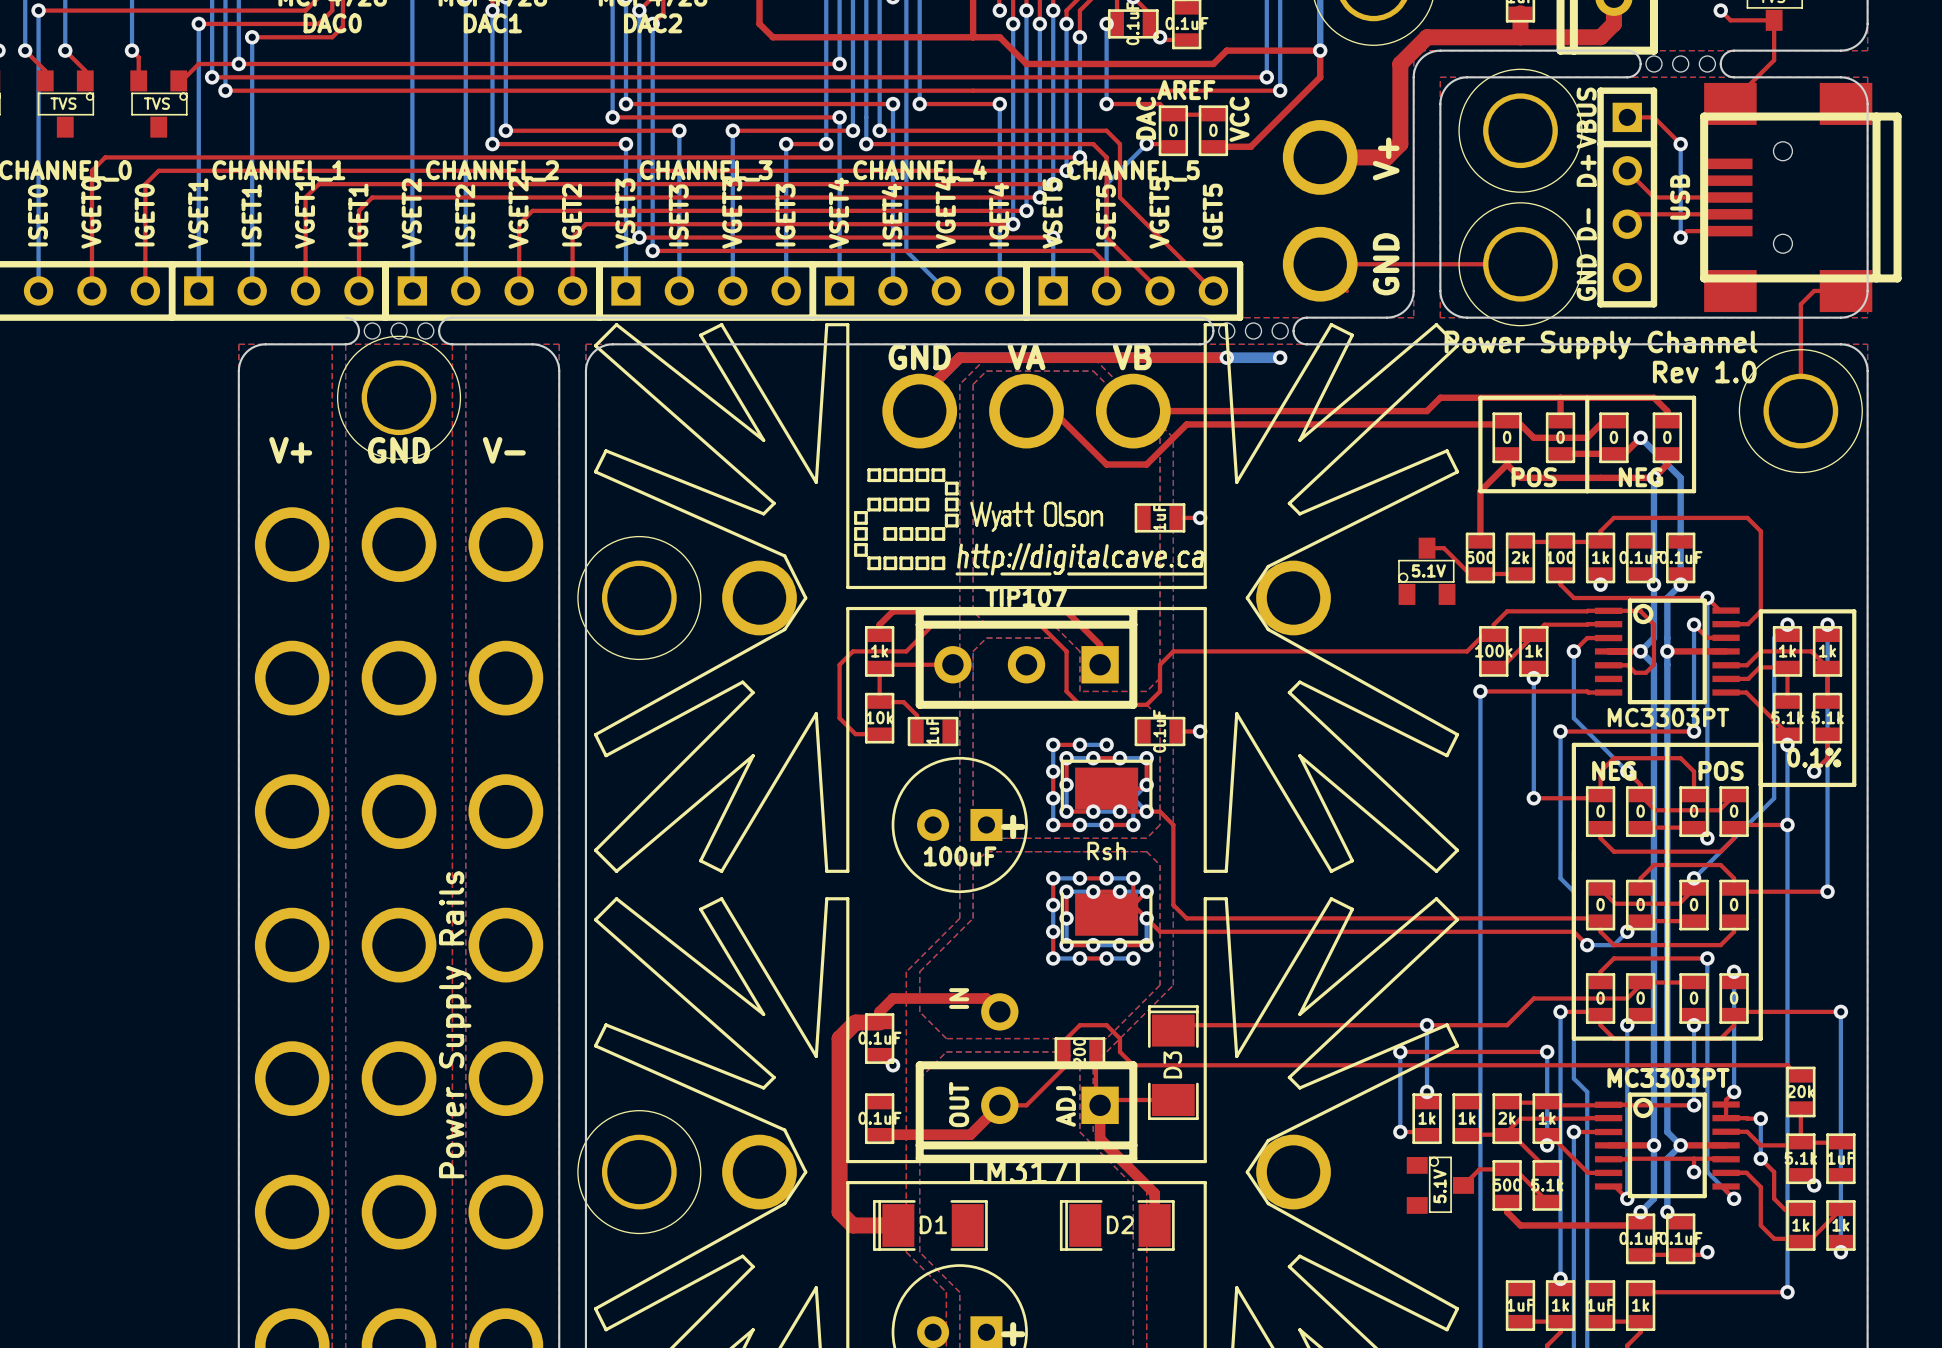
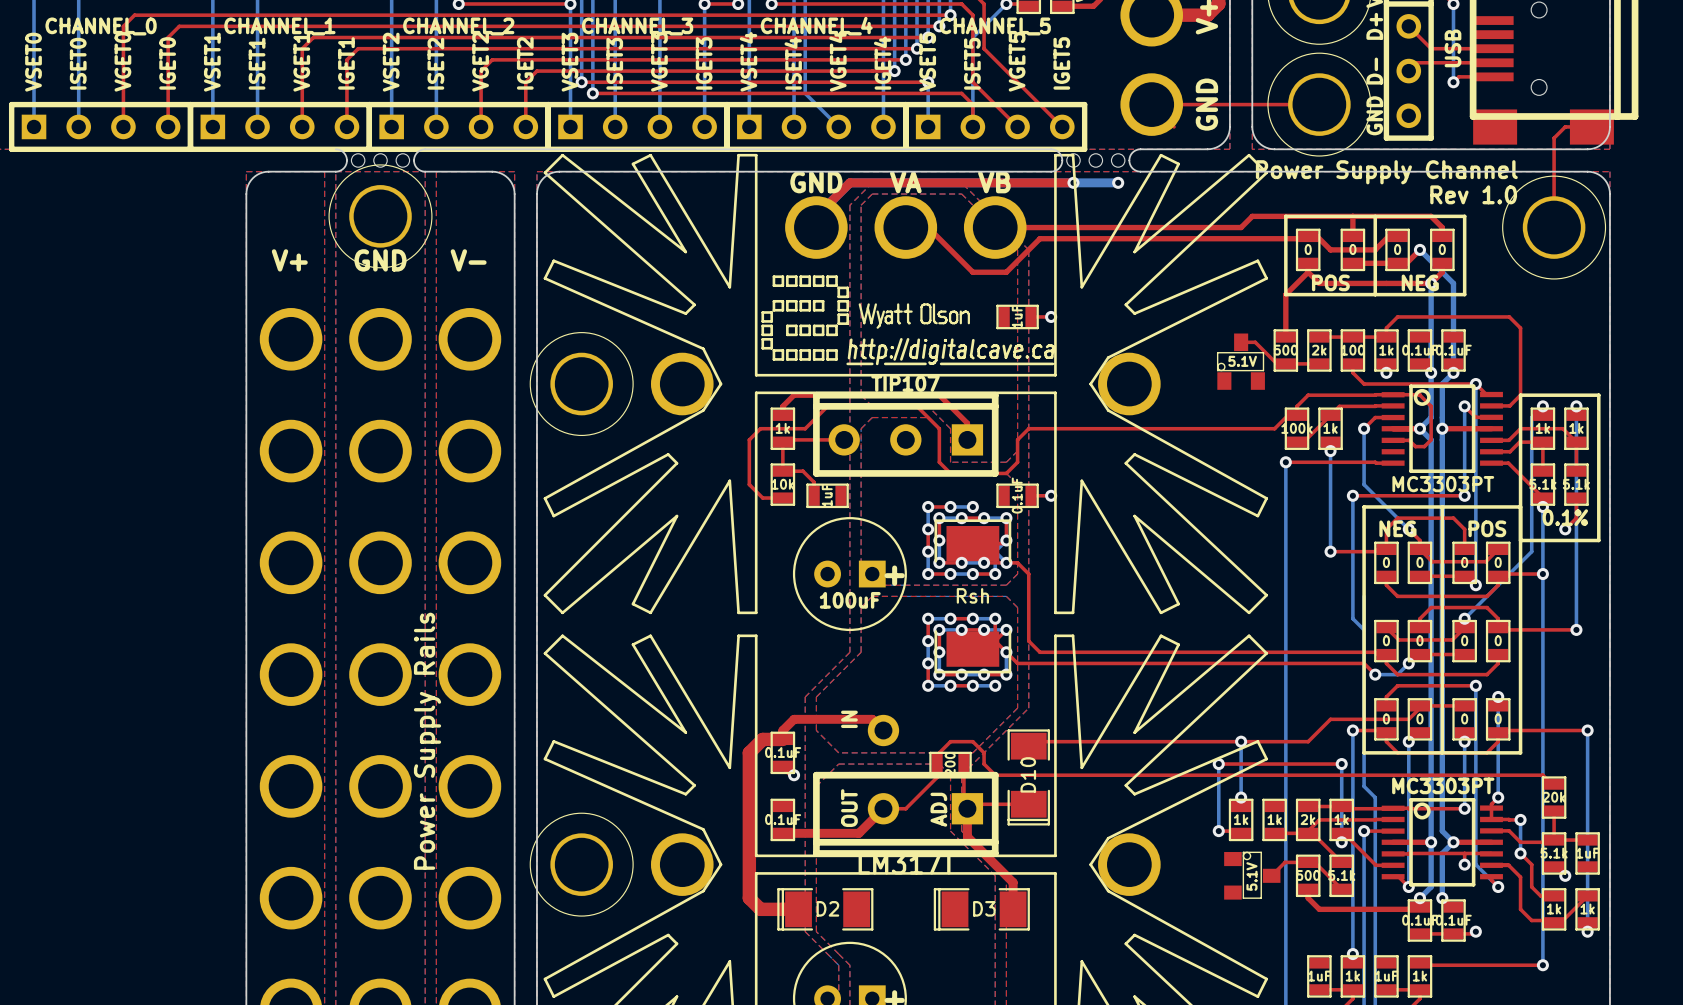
D3: (1173, 1062) -> none
D10: none -> (1028, 777)
D1 name: D1 (933, 1224) -> D2 (827, 908)
D2 name: D2 (1120, 1224) -> D3 (984, 908)

